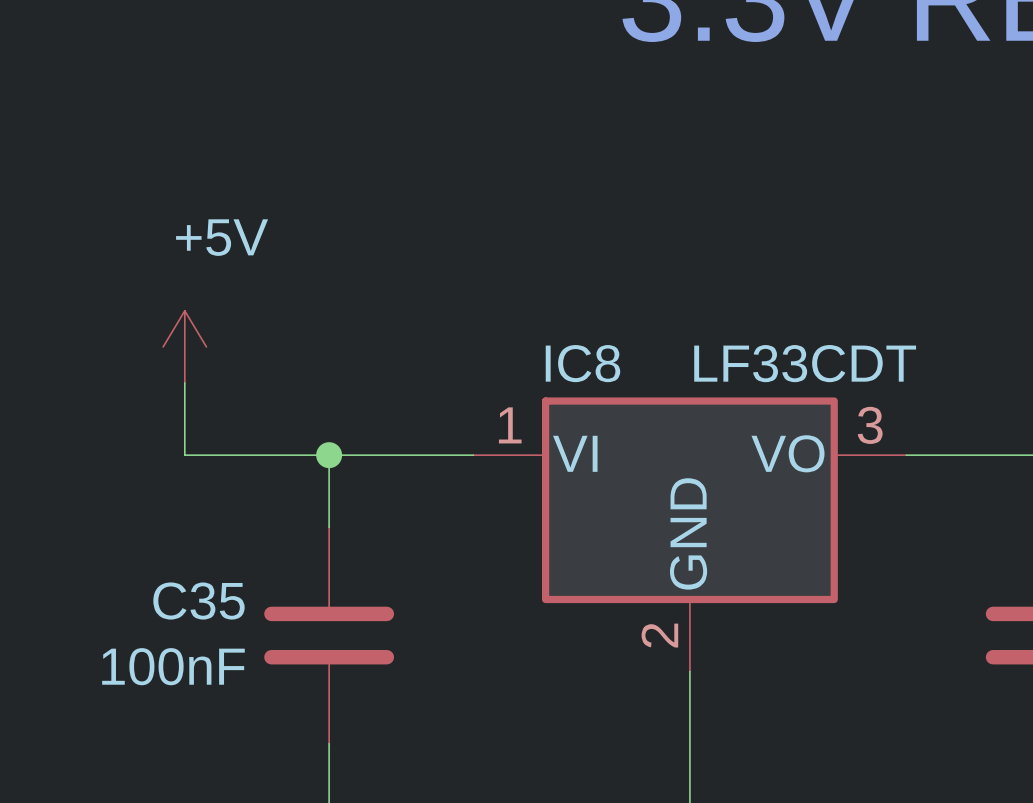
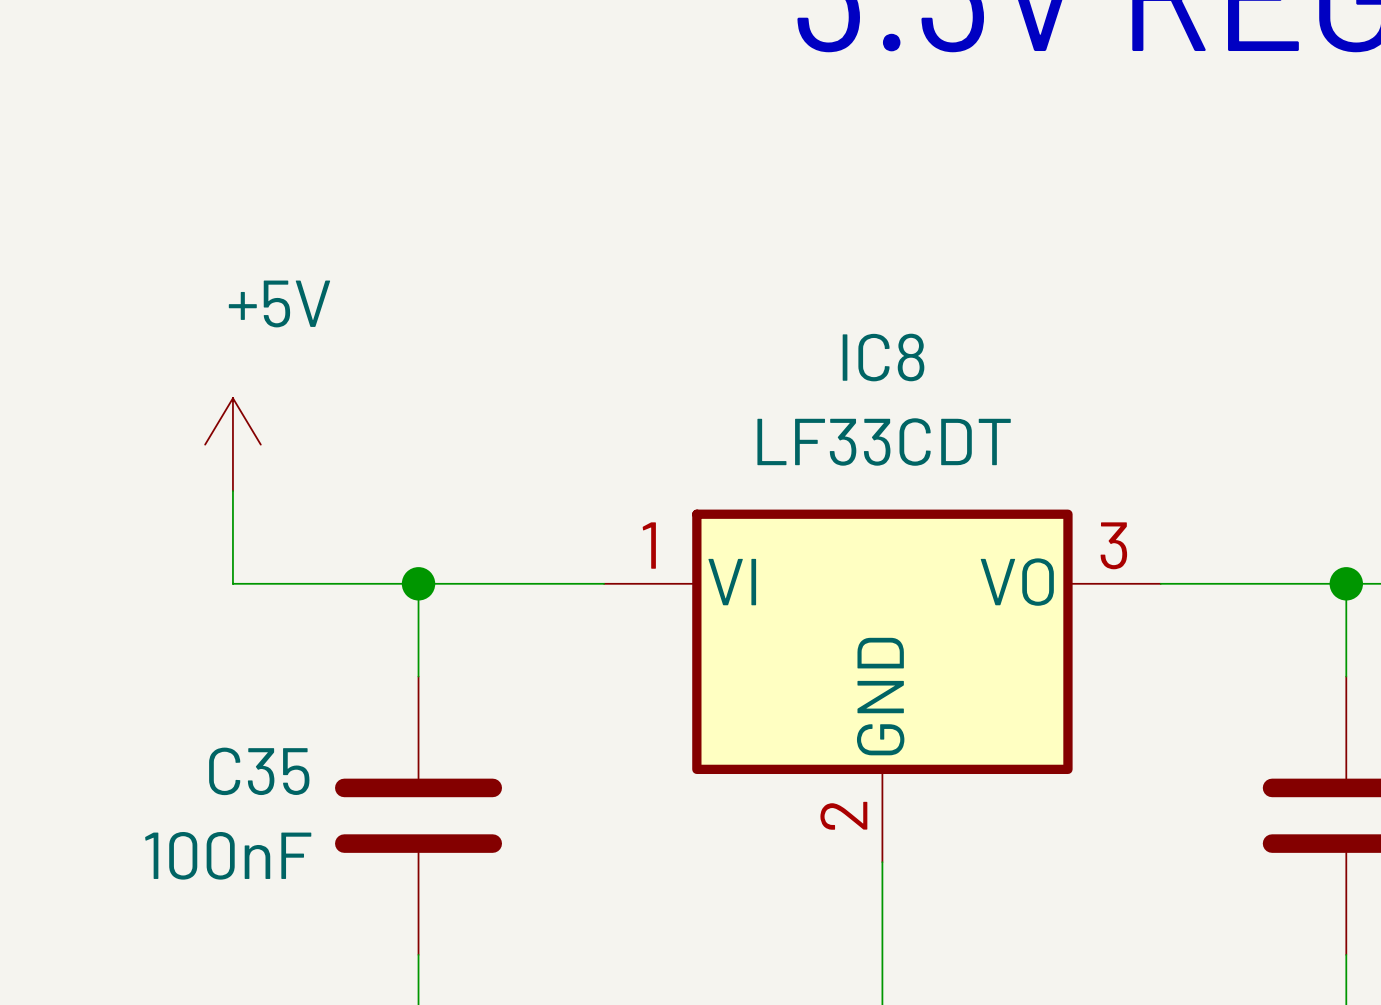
IC8 name position: IC8 (582, 363) -> IC8 (883, 357)
IC8 value position: LF33CDT (805, 363) -> LF33CDT (884, 442)

